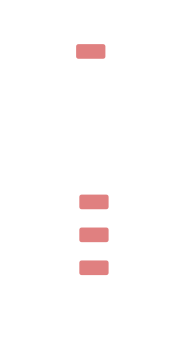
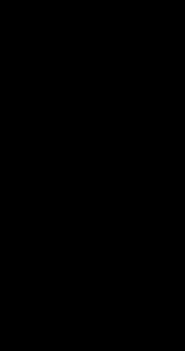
part: (90, 51) -> none
part: (93, 201) -> none
part: (93, 234) -> none
part: (93, 267) -> none

